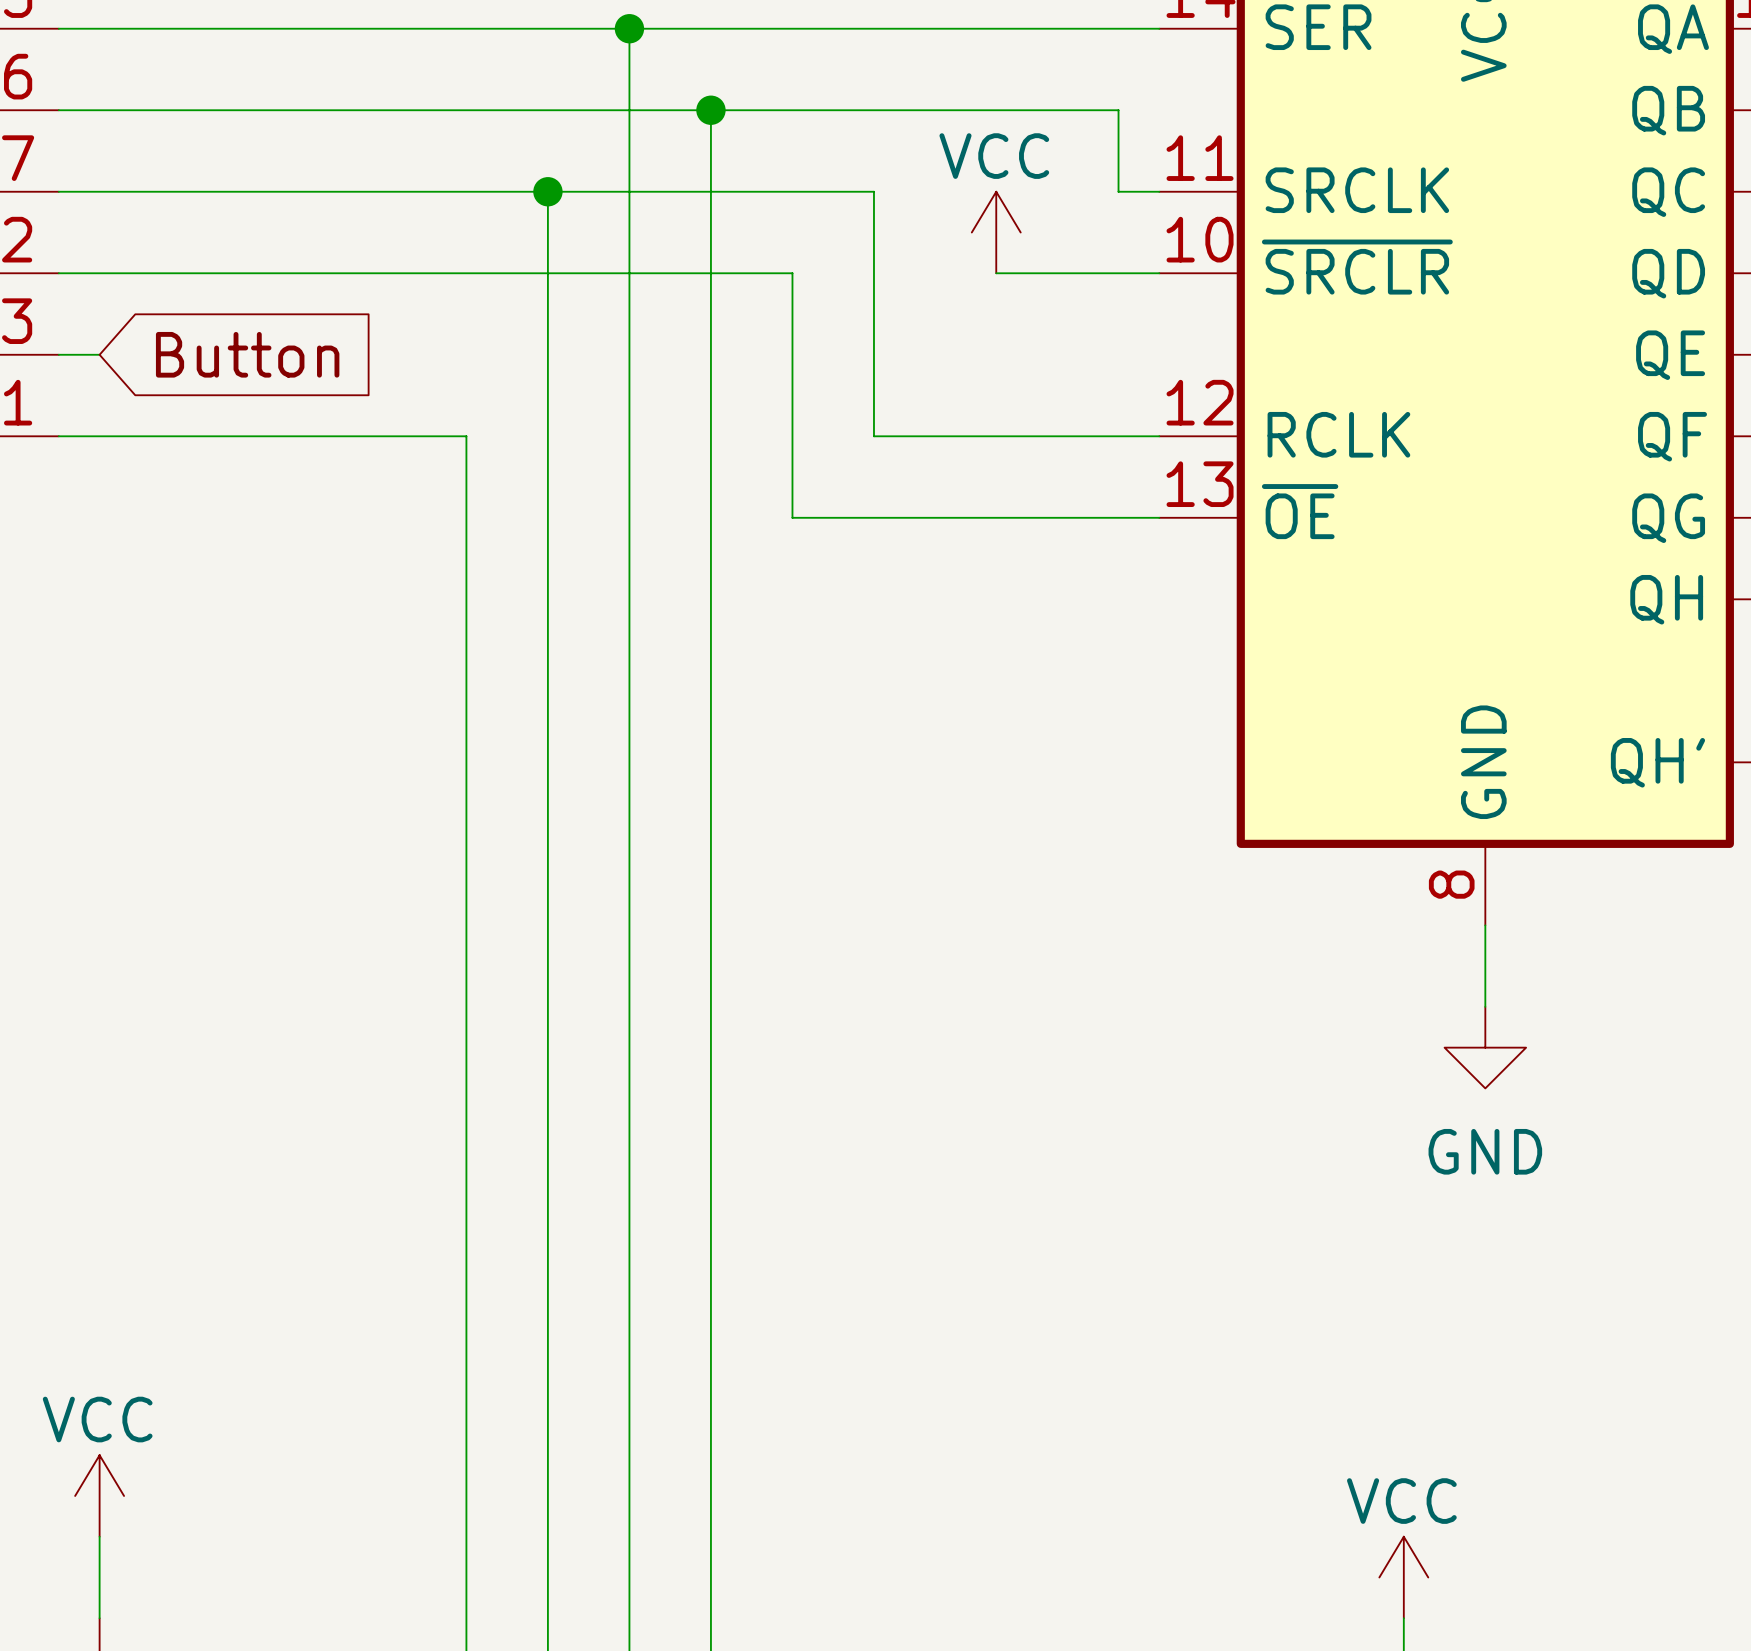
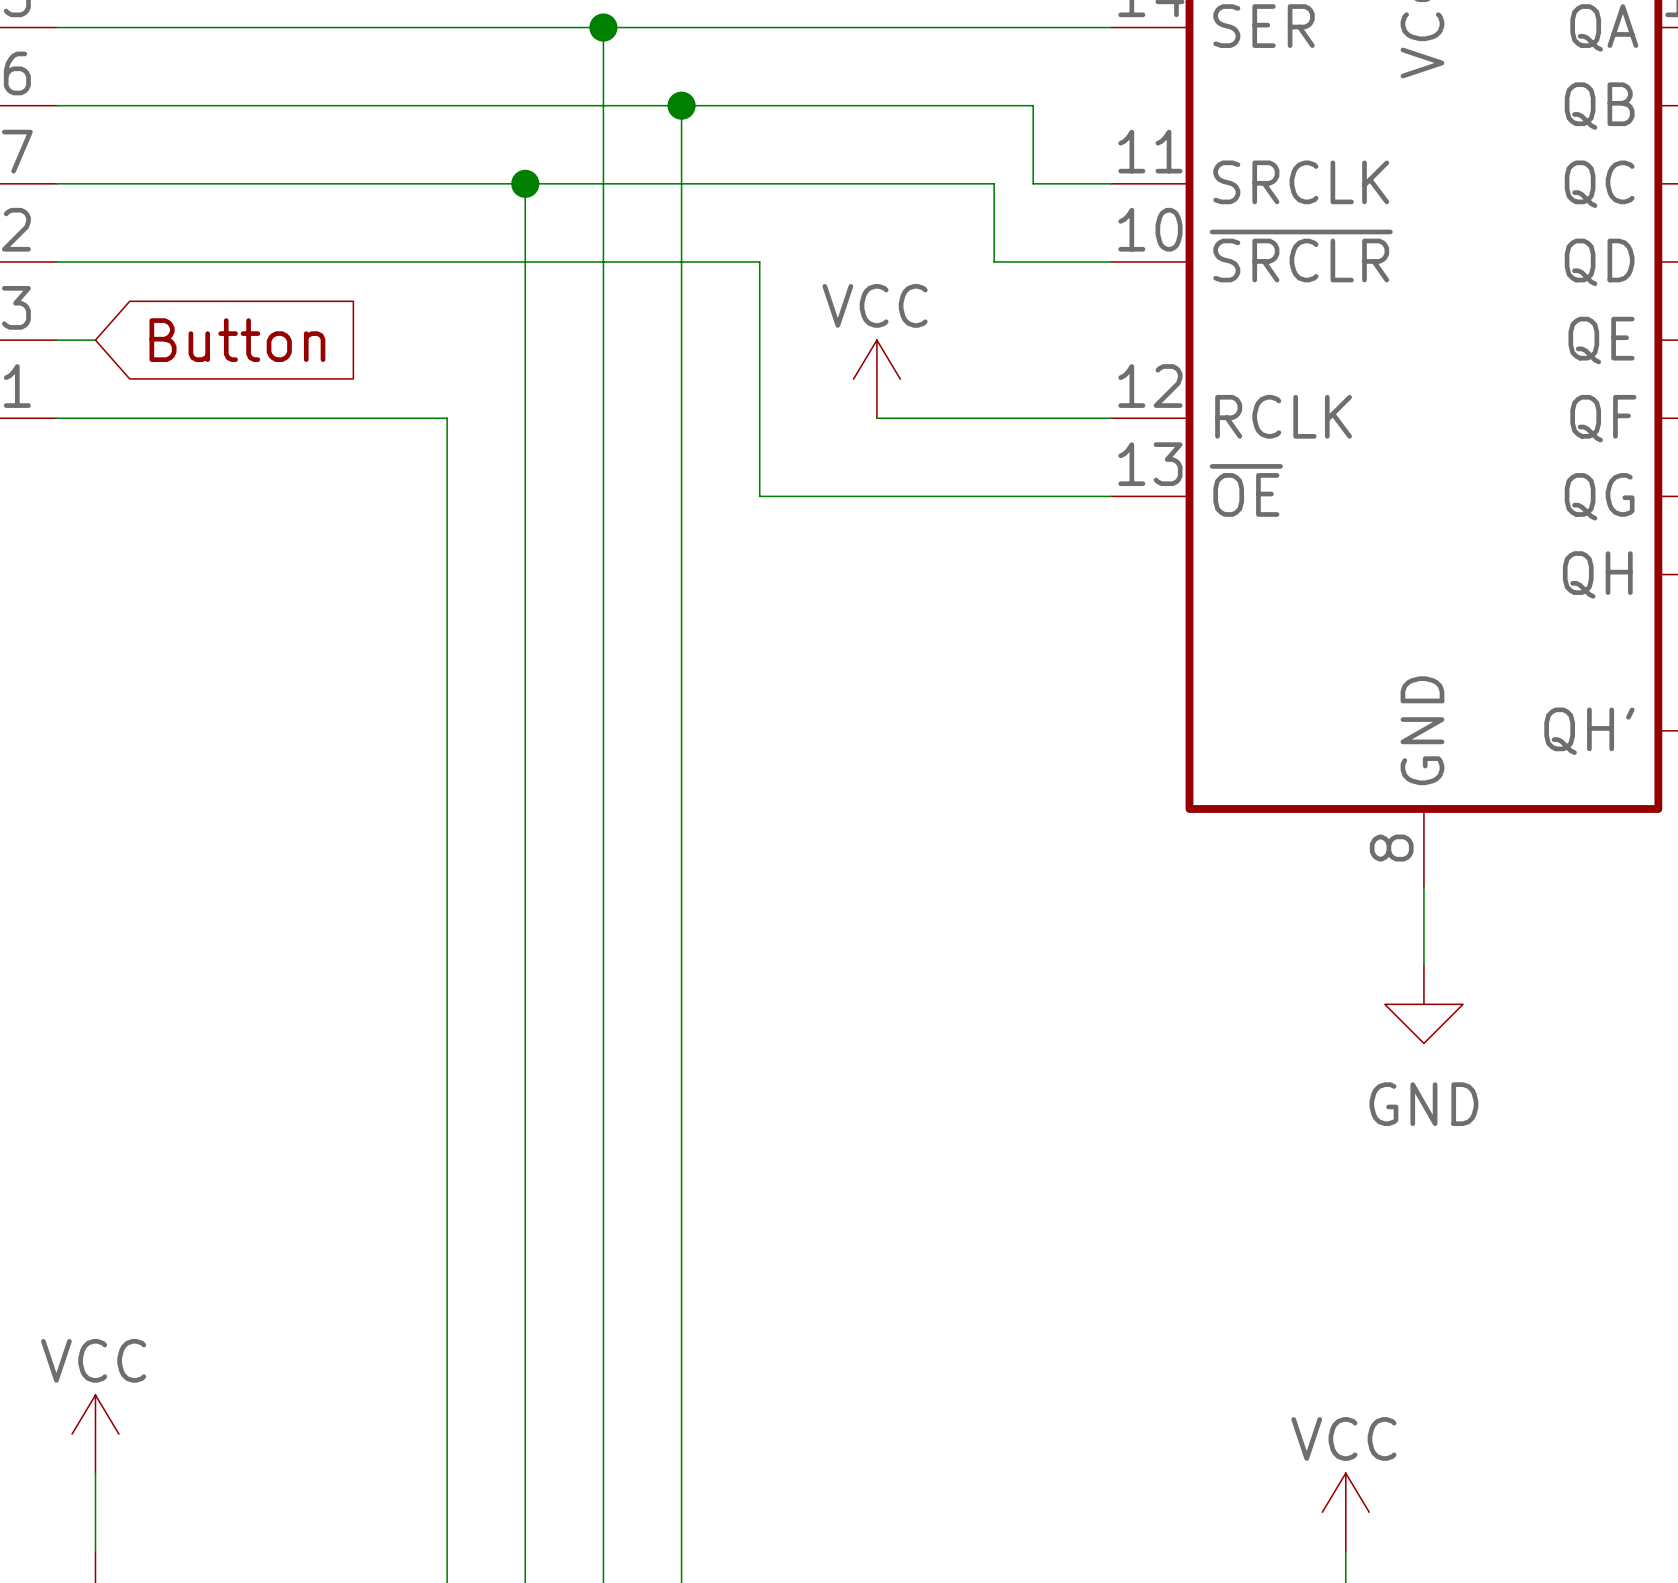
wire: (1077, 110) (1118, 110) (1118, 191) -> (1033, 105) (1033, 183) (1072, 183)
wire: (873, 191) (873, 436) (914, 436) -> none
power symbol position: VCC (996, 232) -> VCC (876, 379)
wire: (996, 273) (1037, 273) -> (837, 183) (994, 183) (994, 261)

